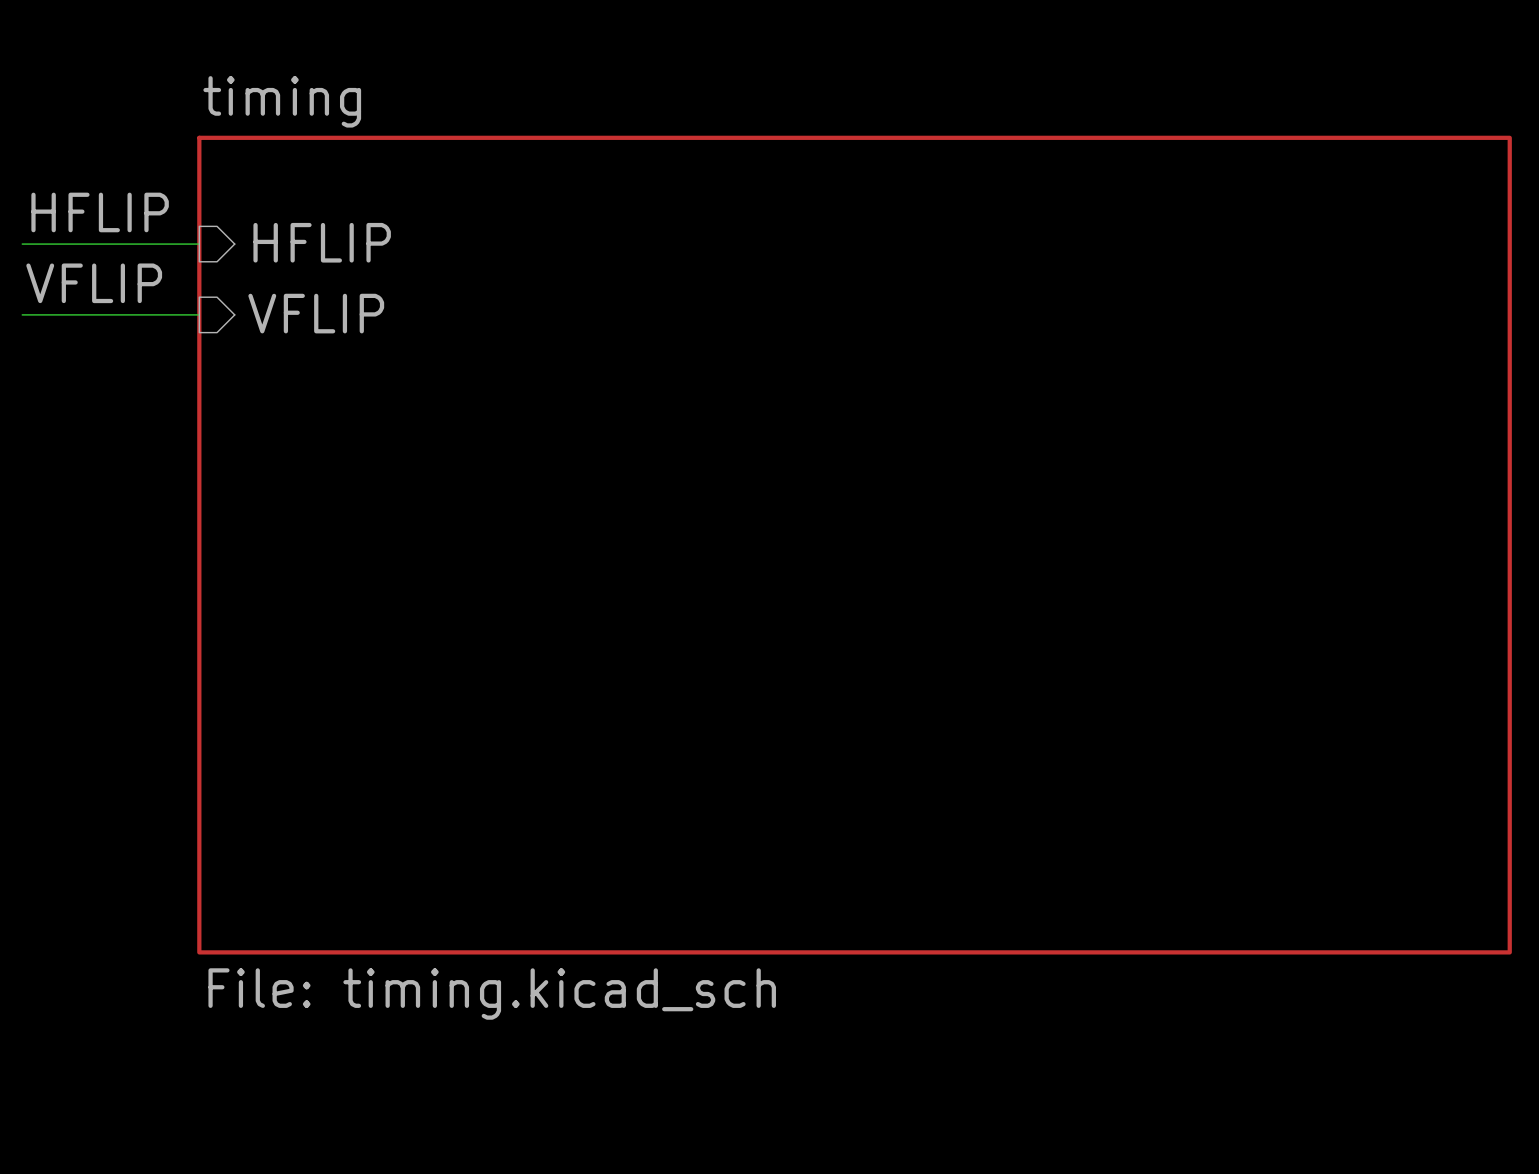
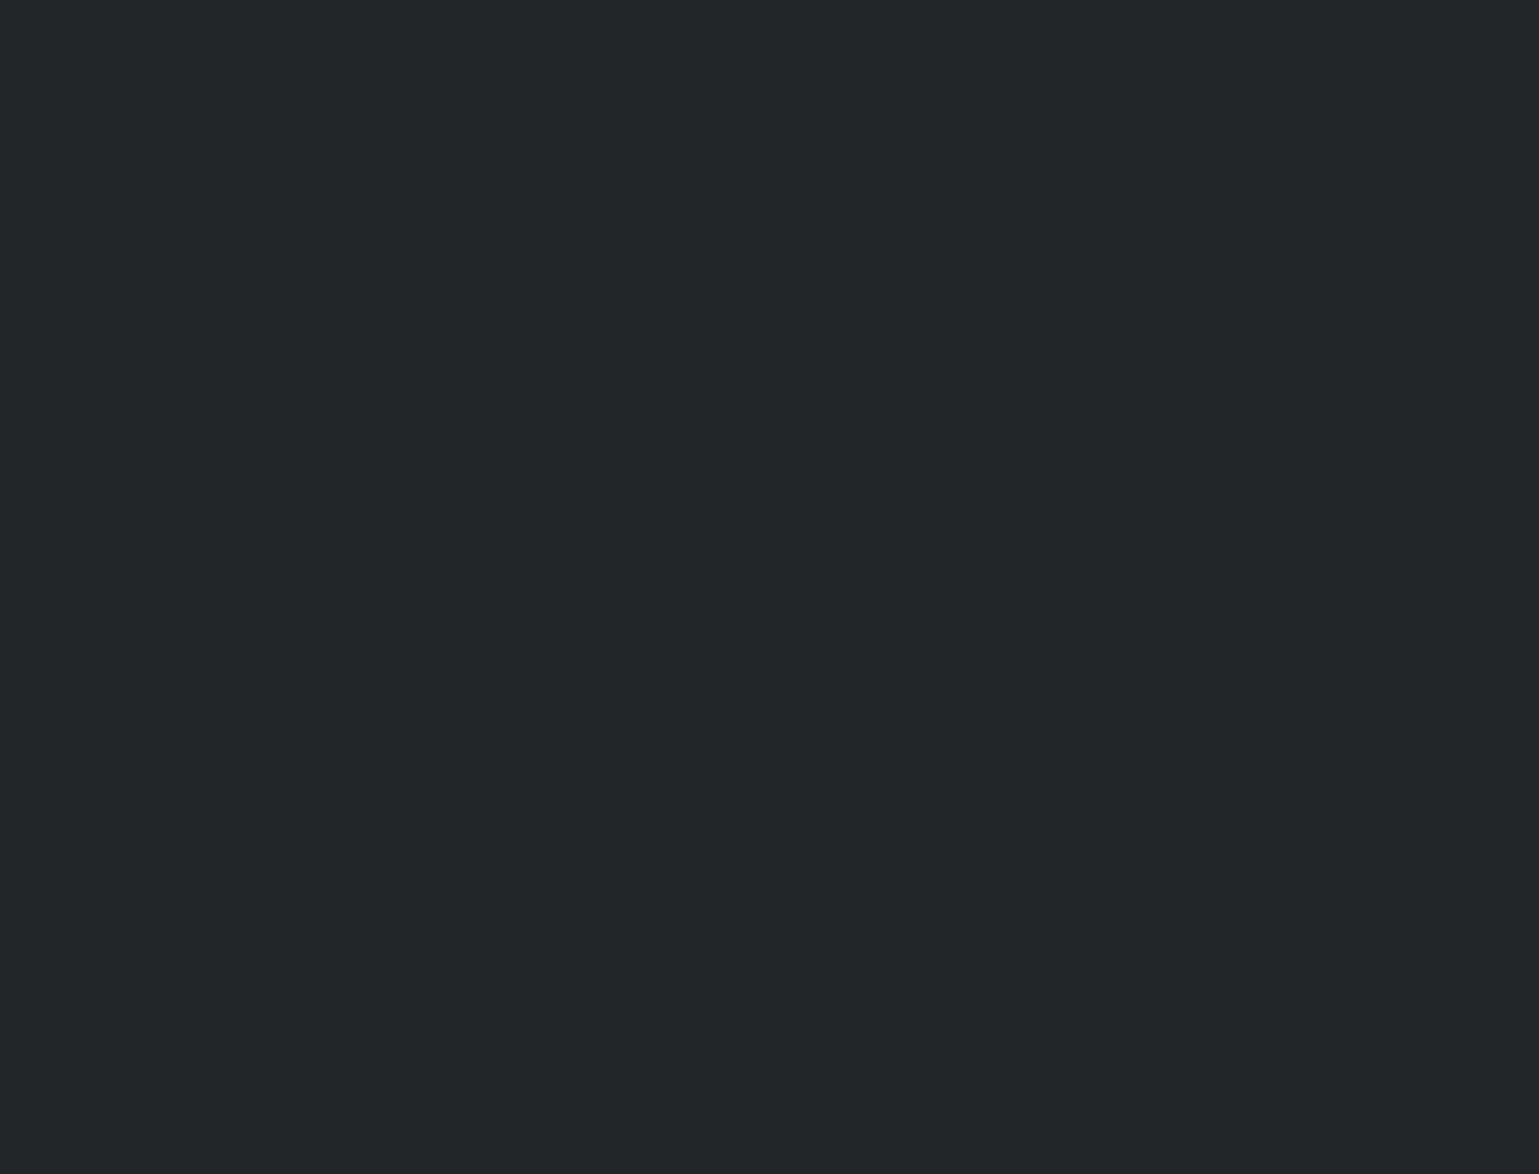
label: HFLIP (100, 212) -> none
sheet pin: HFLIP (322, 242) -> none
wire: (22, 244) (199, 244) -> none
label: VFLIP (94, 283) -> none
sheet pin: VFLIP (316, 313) -> none
wire: (22, 314) (199, 314) -> none
sheet timing: File: timing.kicad_sch (854, 545) -> none

